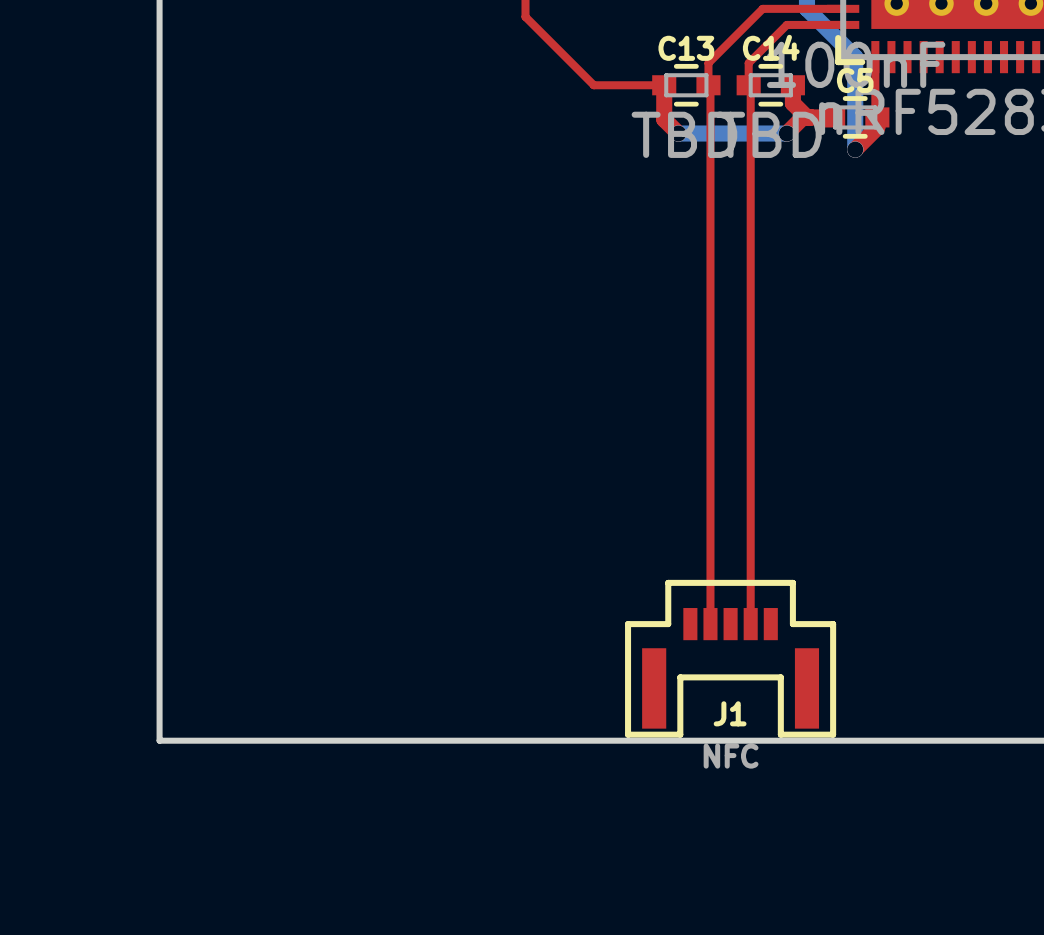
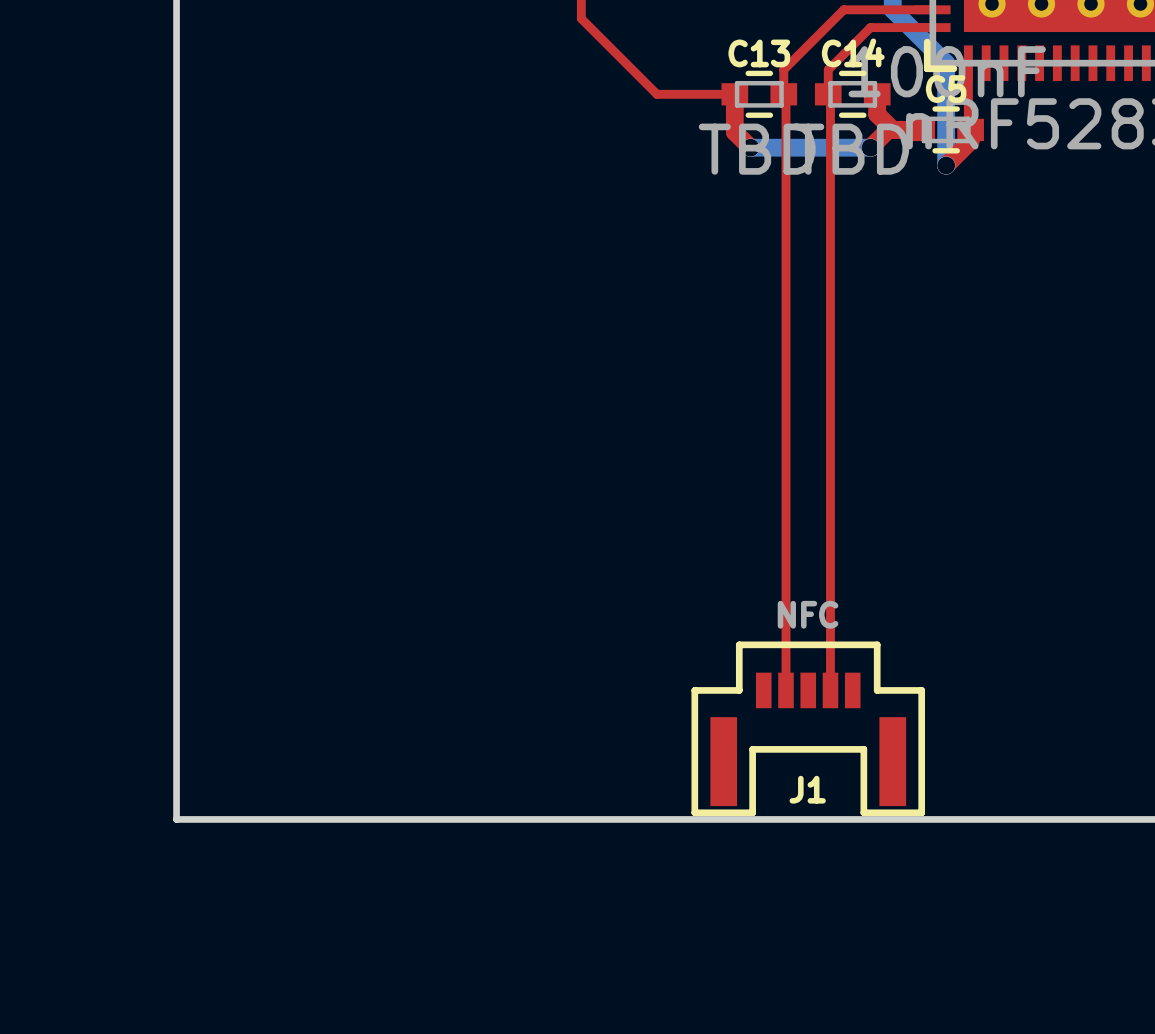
J1 value position: NFC (731, 756) -> NFC (808, 614)

